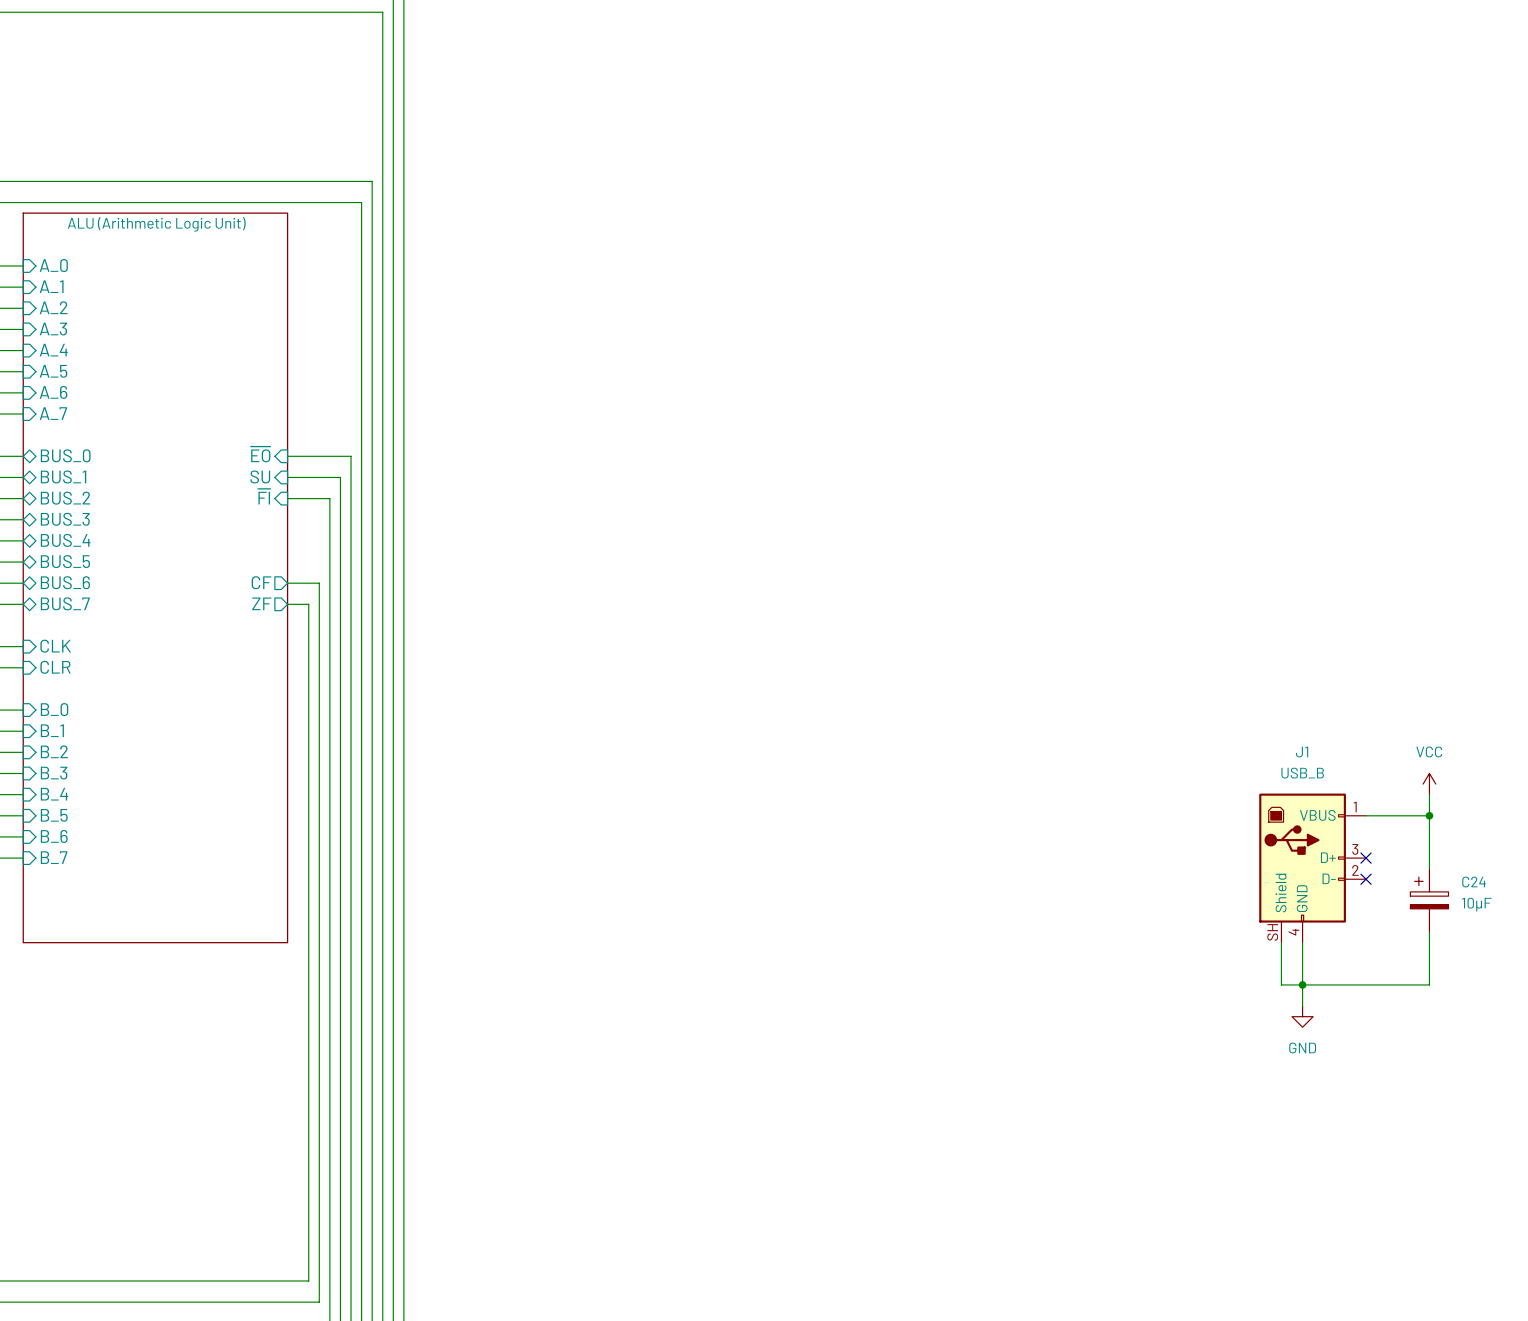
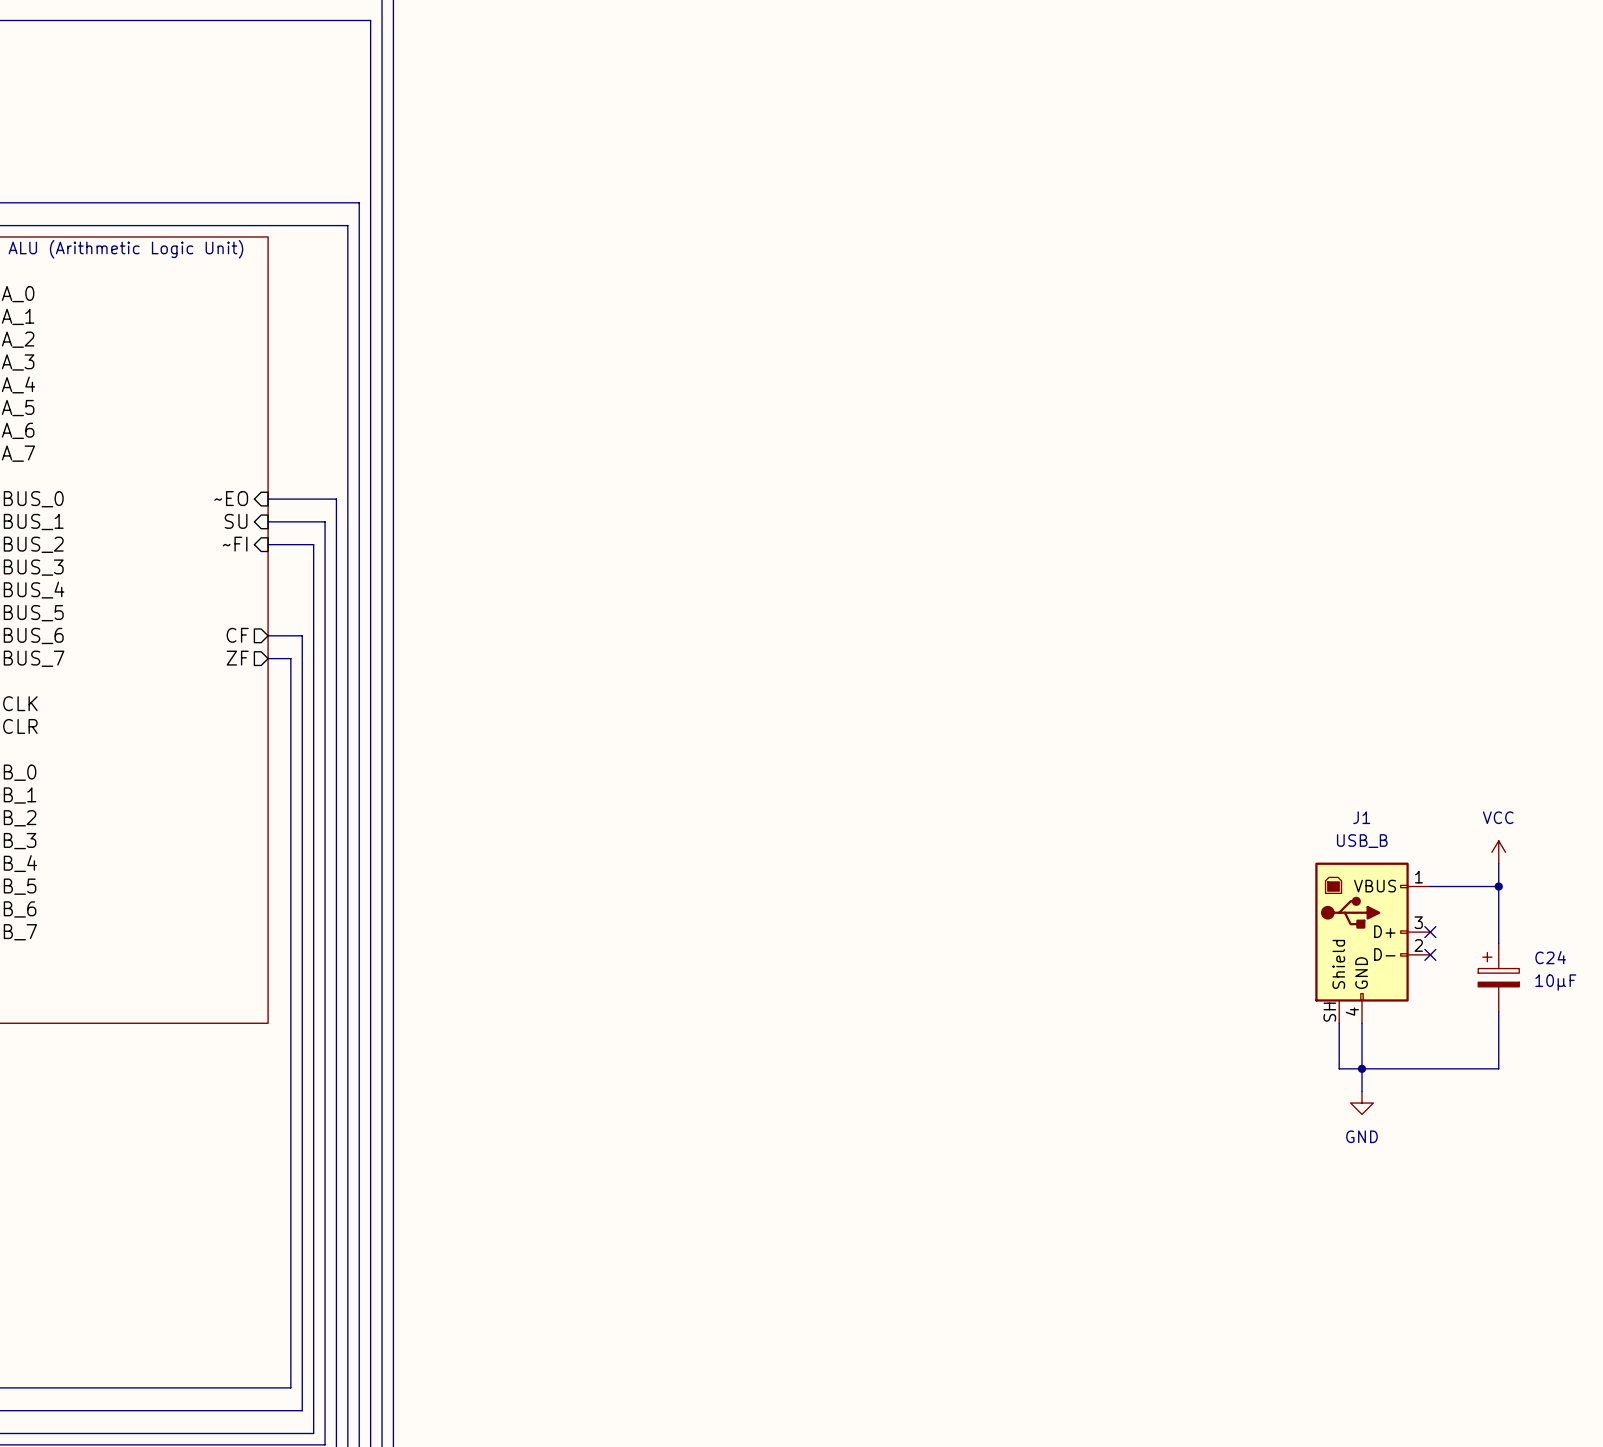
sheet pin: ~{EO} (260, 454) -> ~EO (231, 498)
sheet pin: ~{FI} (264, 496) -> ~FI (235, 544)

